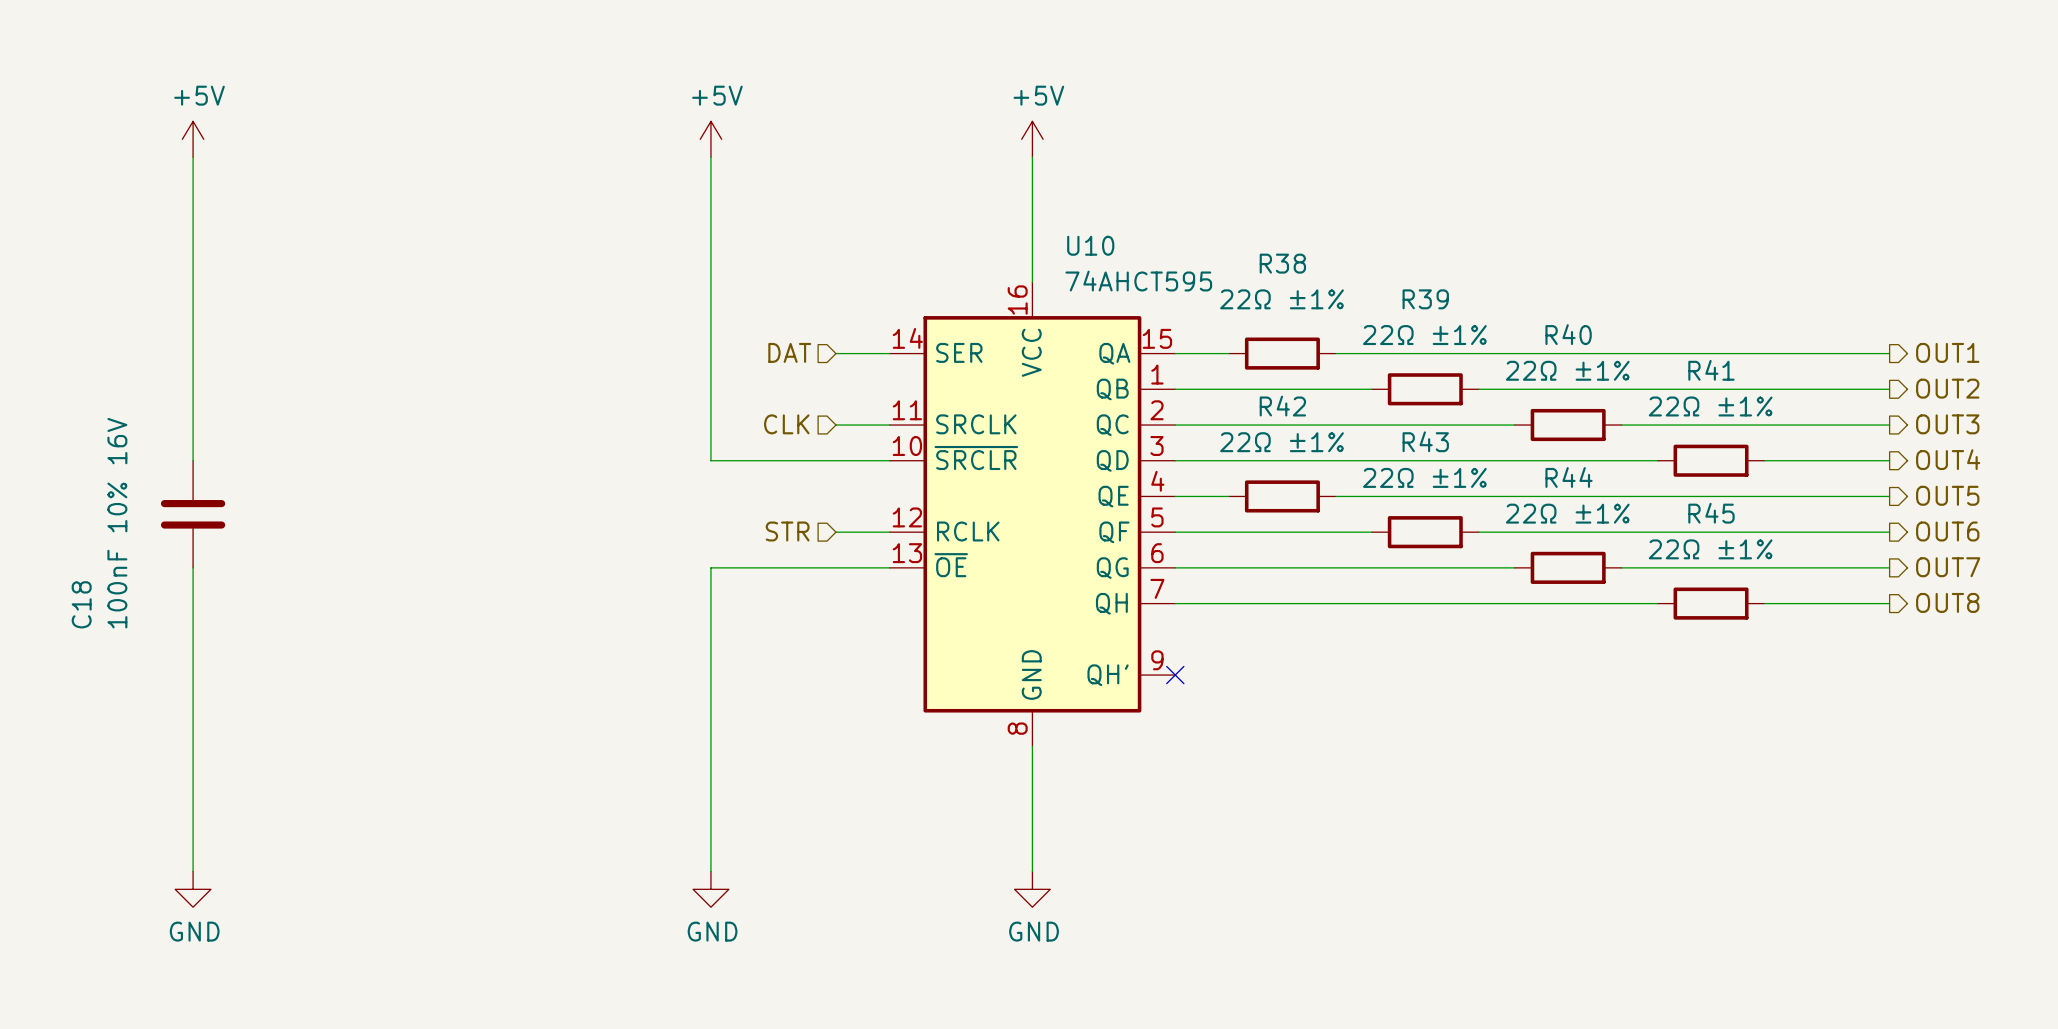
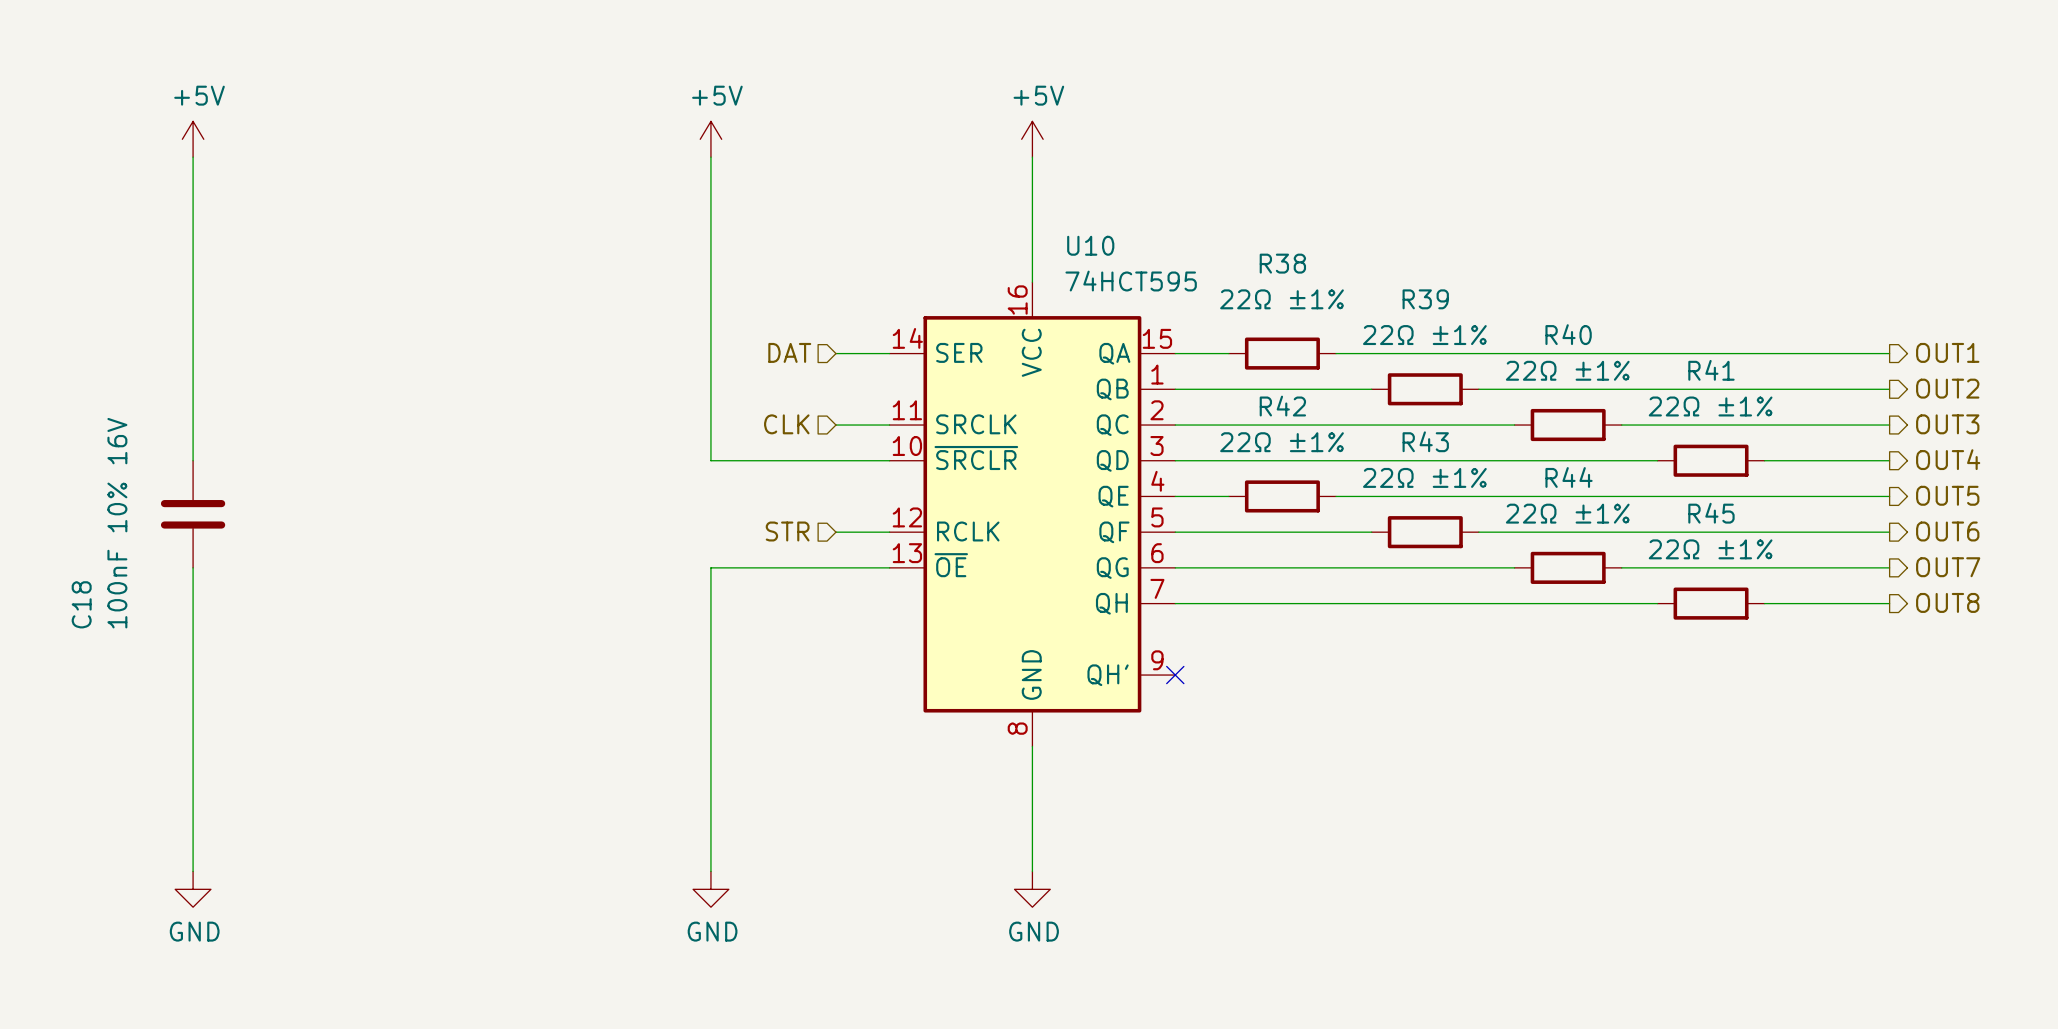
U10 value: 74AHCT595 (1138, 281) -> 74HCT595 (1131, 281)

